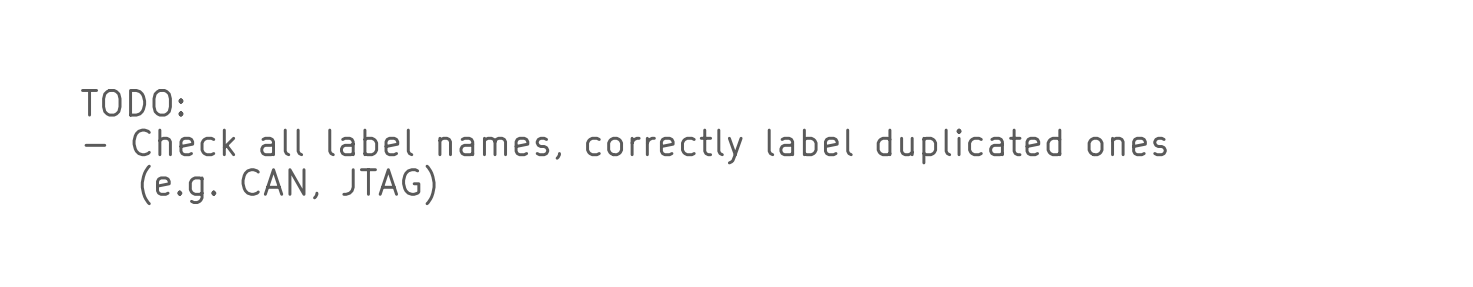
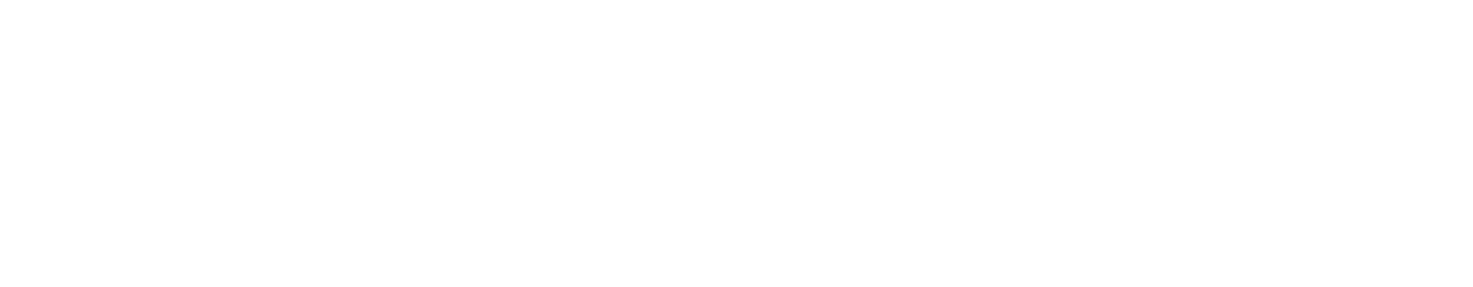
text: TODO: (132, 102) -> none
text: - Check all label names, correctly label duplicated ones (625, 146) -> none
text: (e.g. CAN, JTAG) (288, 184) -> none

